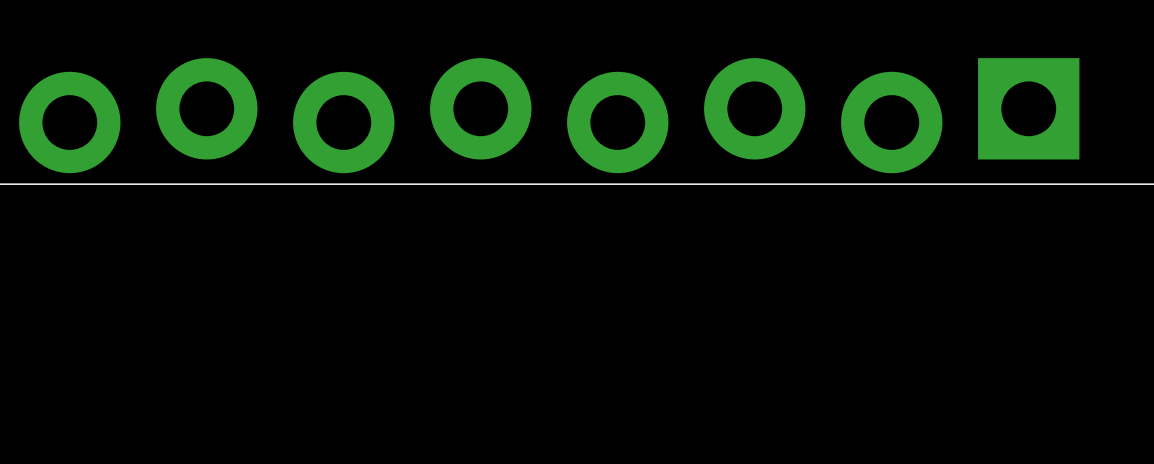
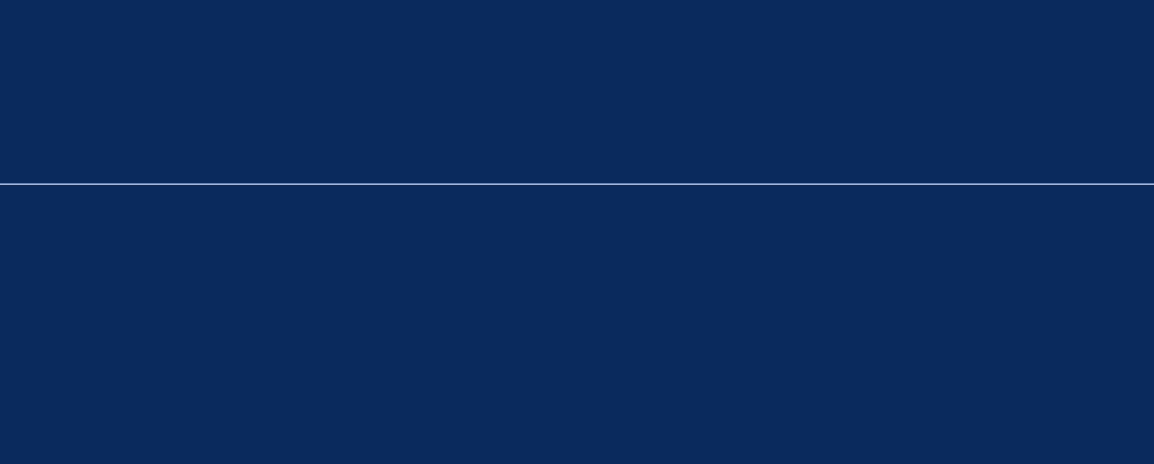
part: (549, 115) -> none

